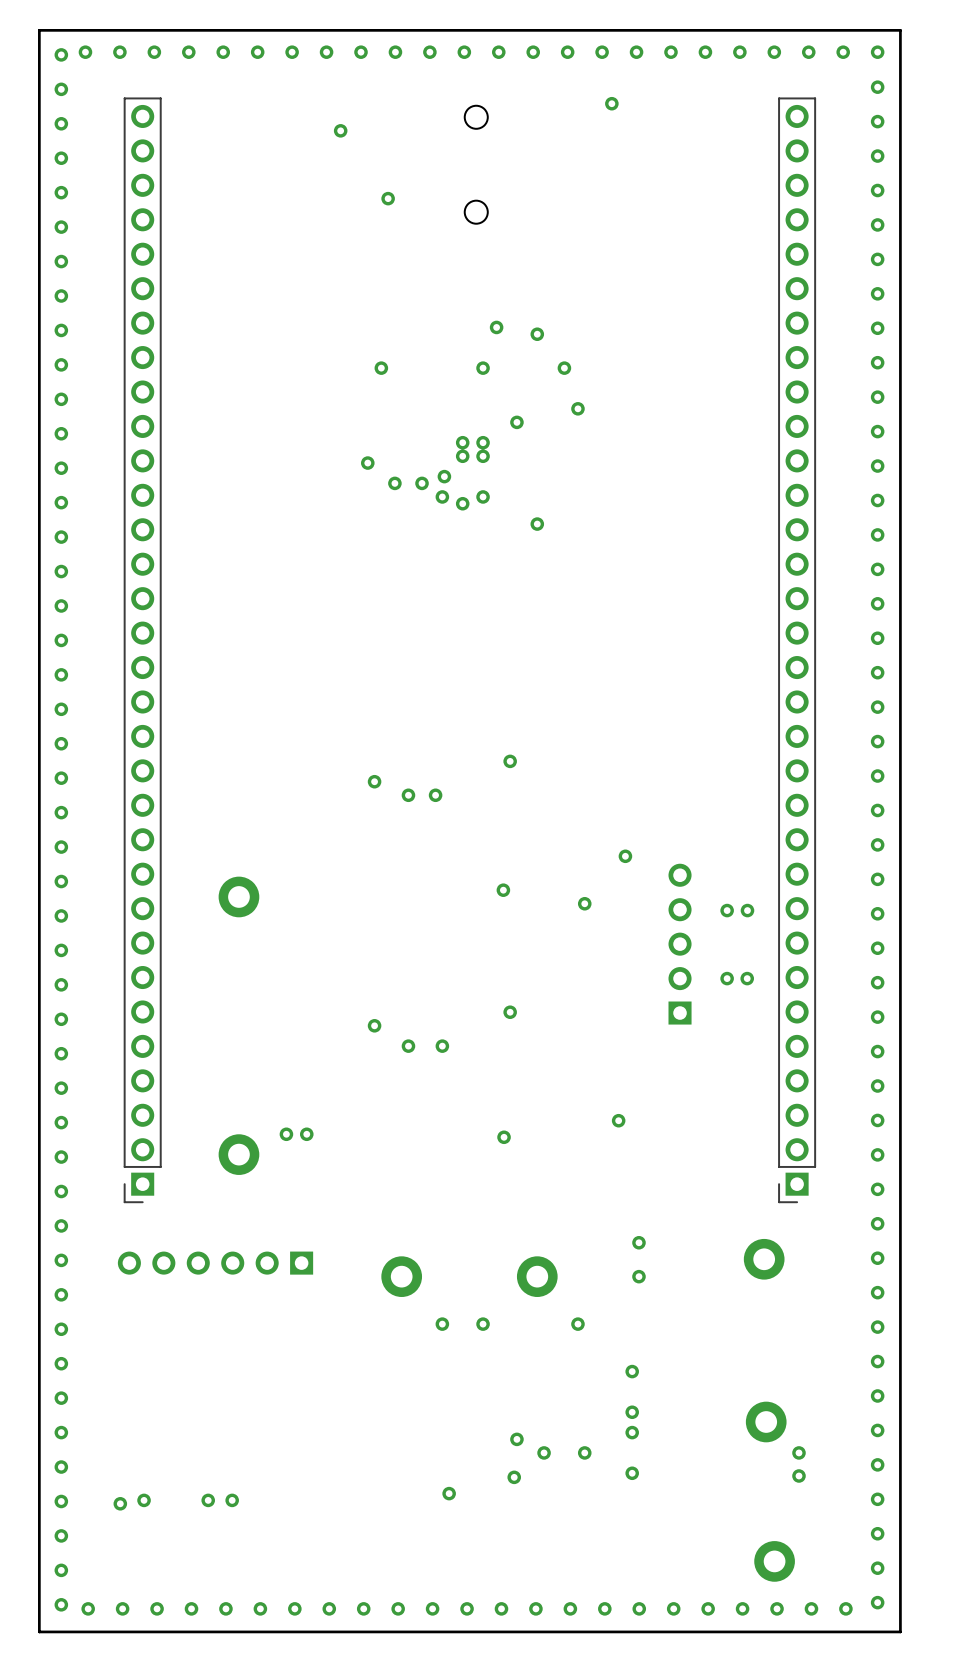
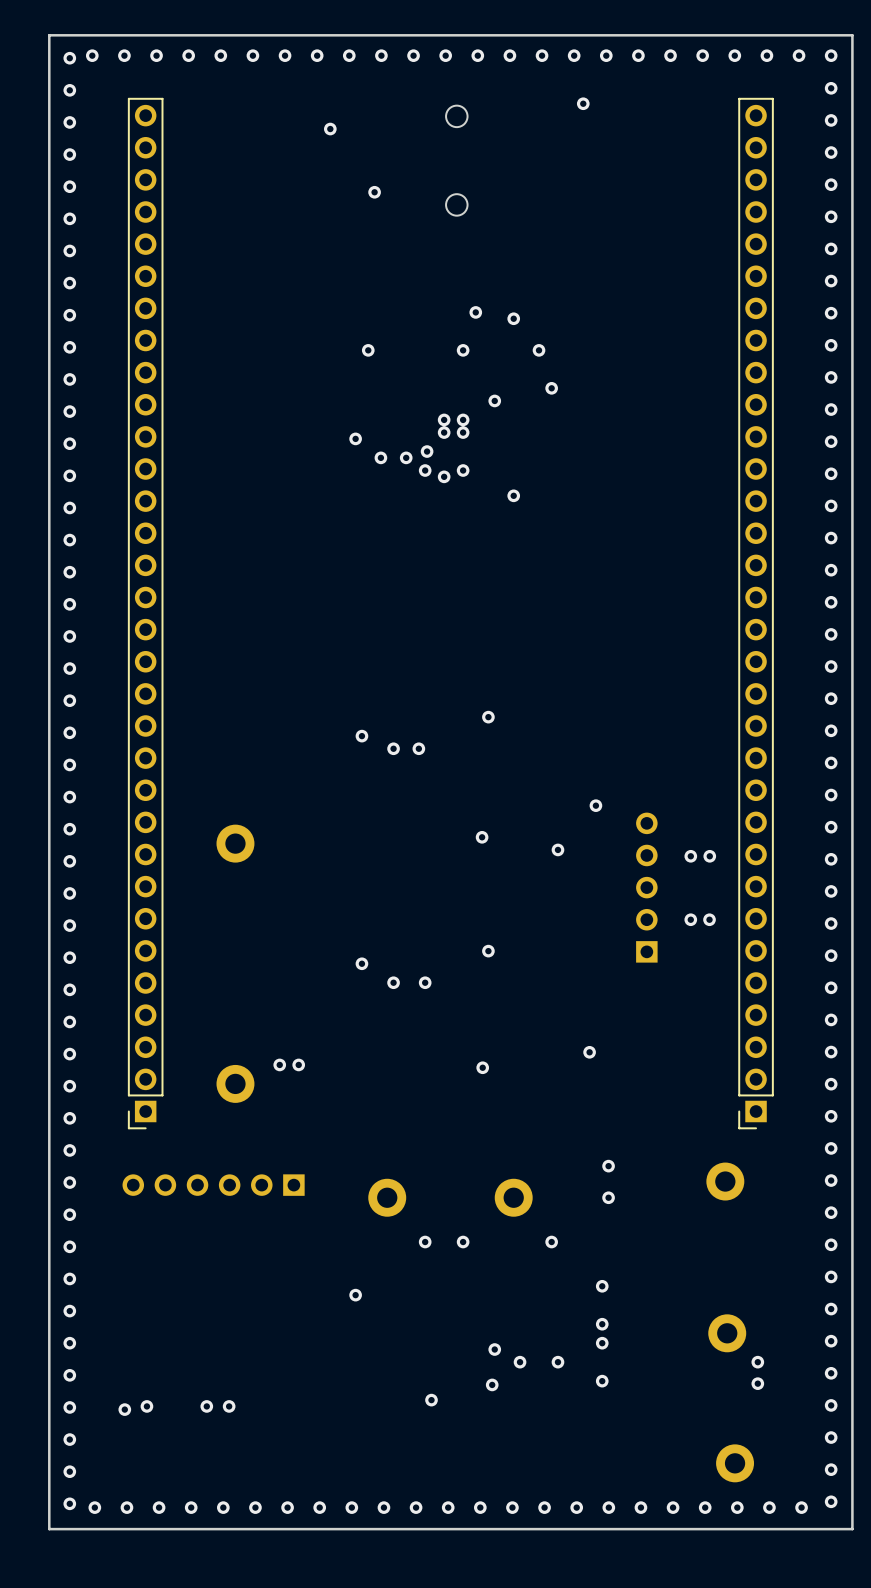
via: none -> (355, 1295)

